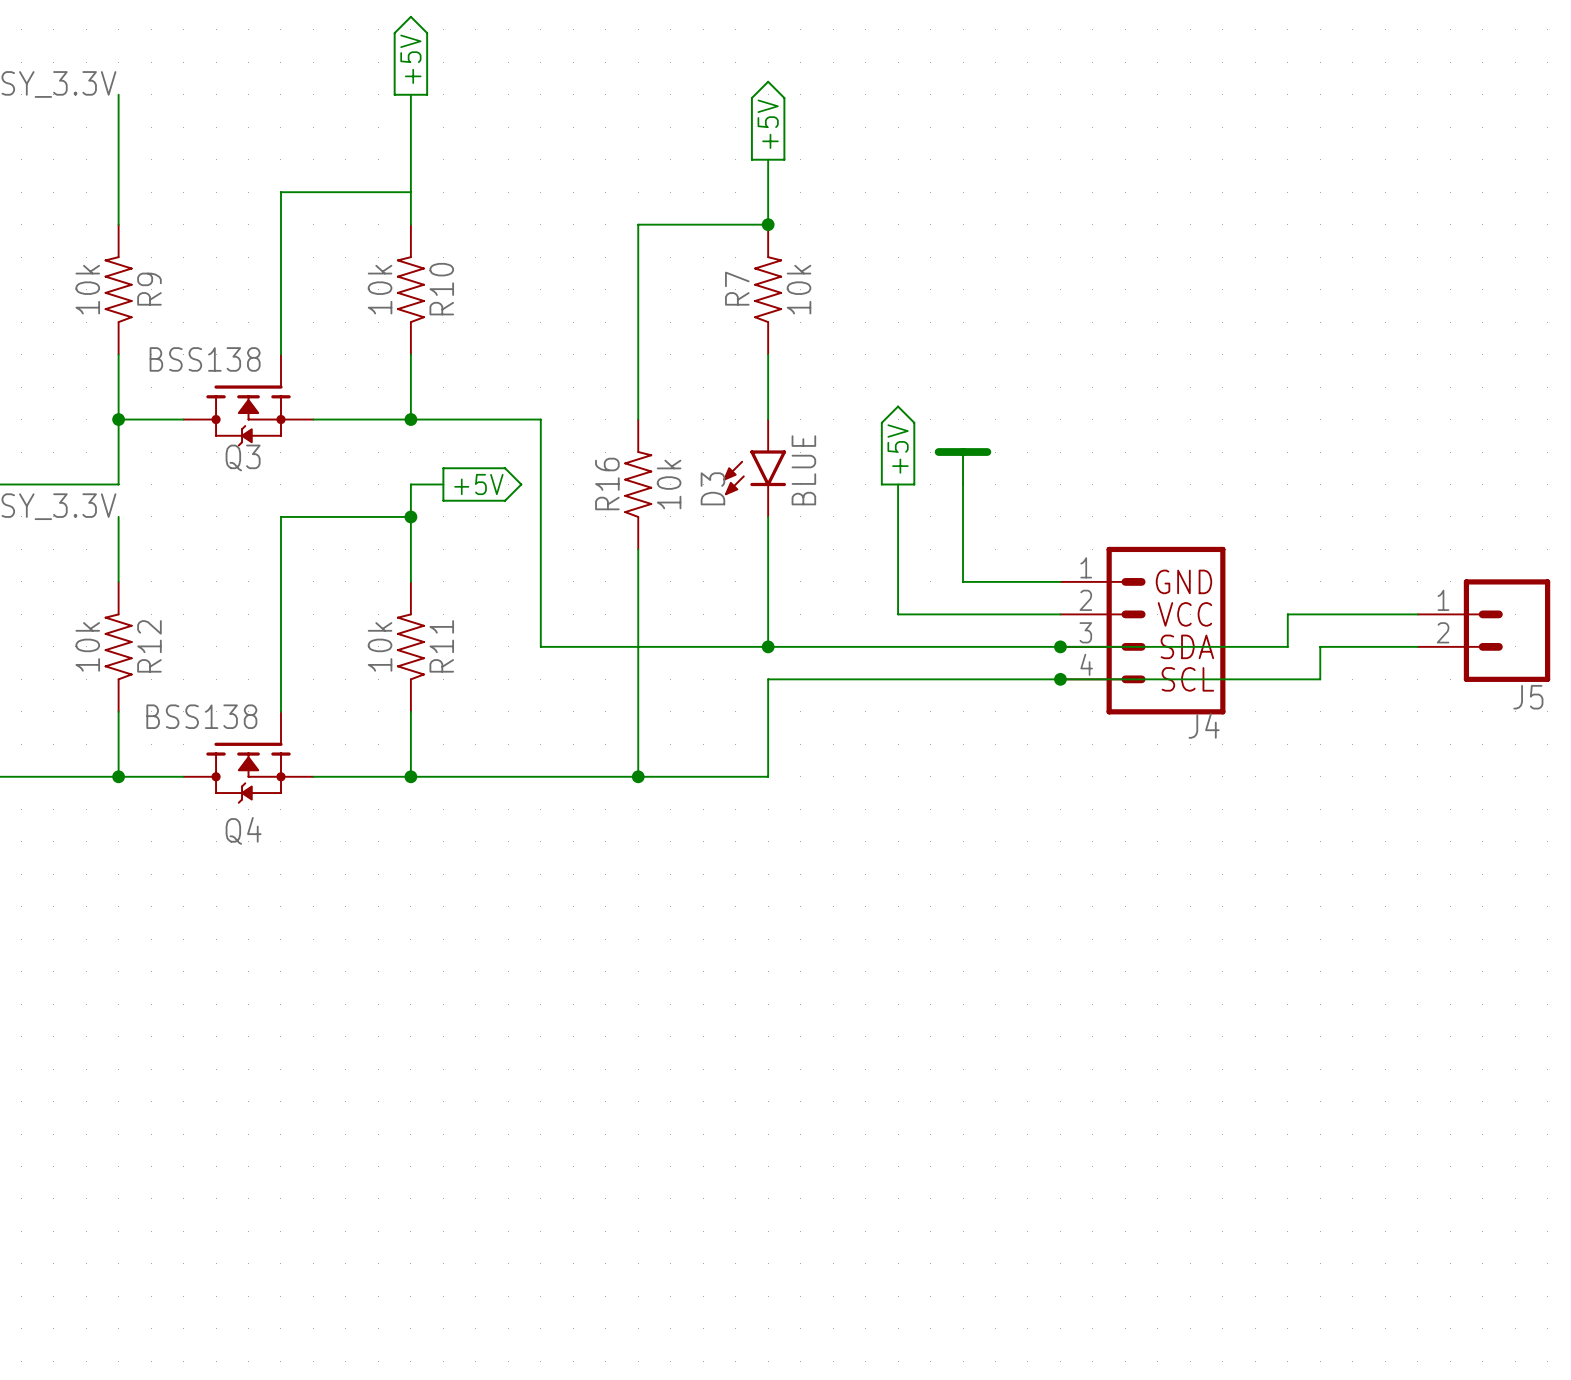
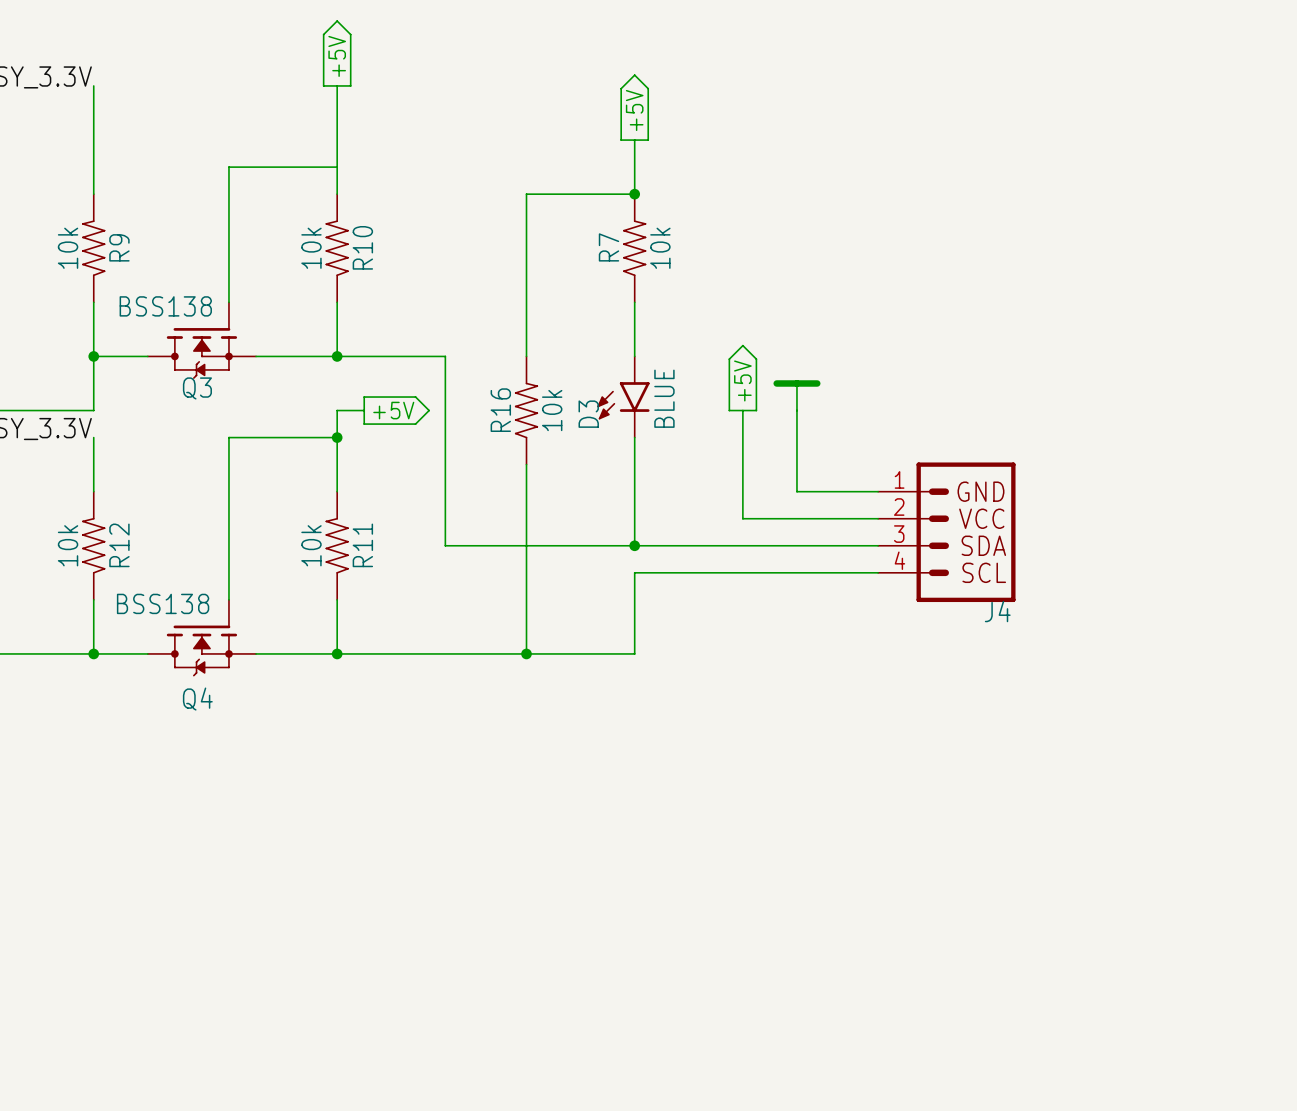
wire: (1417, 614) (1287, 614) (1287, 646) (1060, 646) -> none
J5: (1483, 630) -> none
junction: (1060, 646) -> none
wire: (1417, 646) (1320, 646) (1320, 679) (1060, 679) -> none
junction: (1060, 679) -> none

